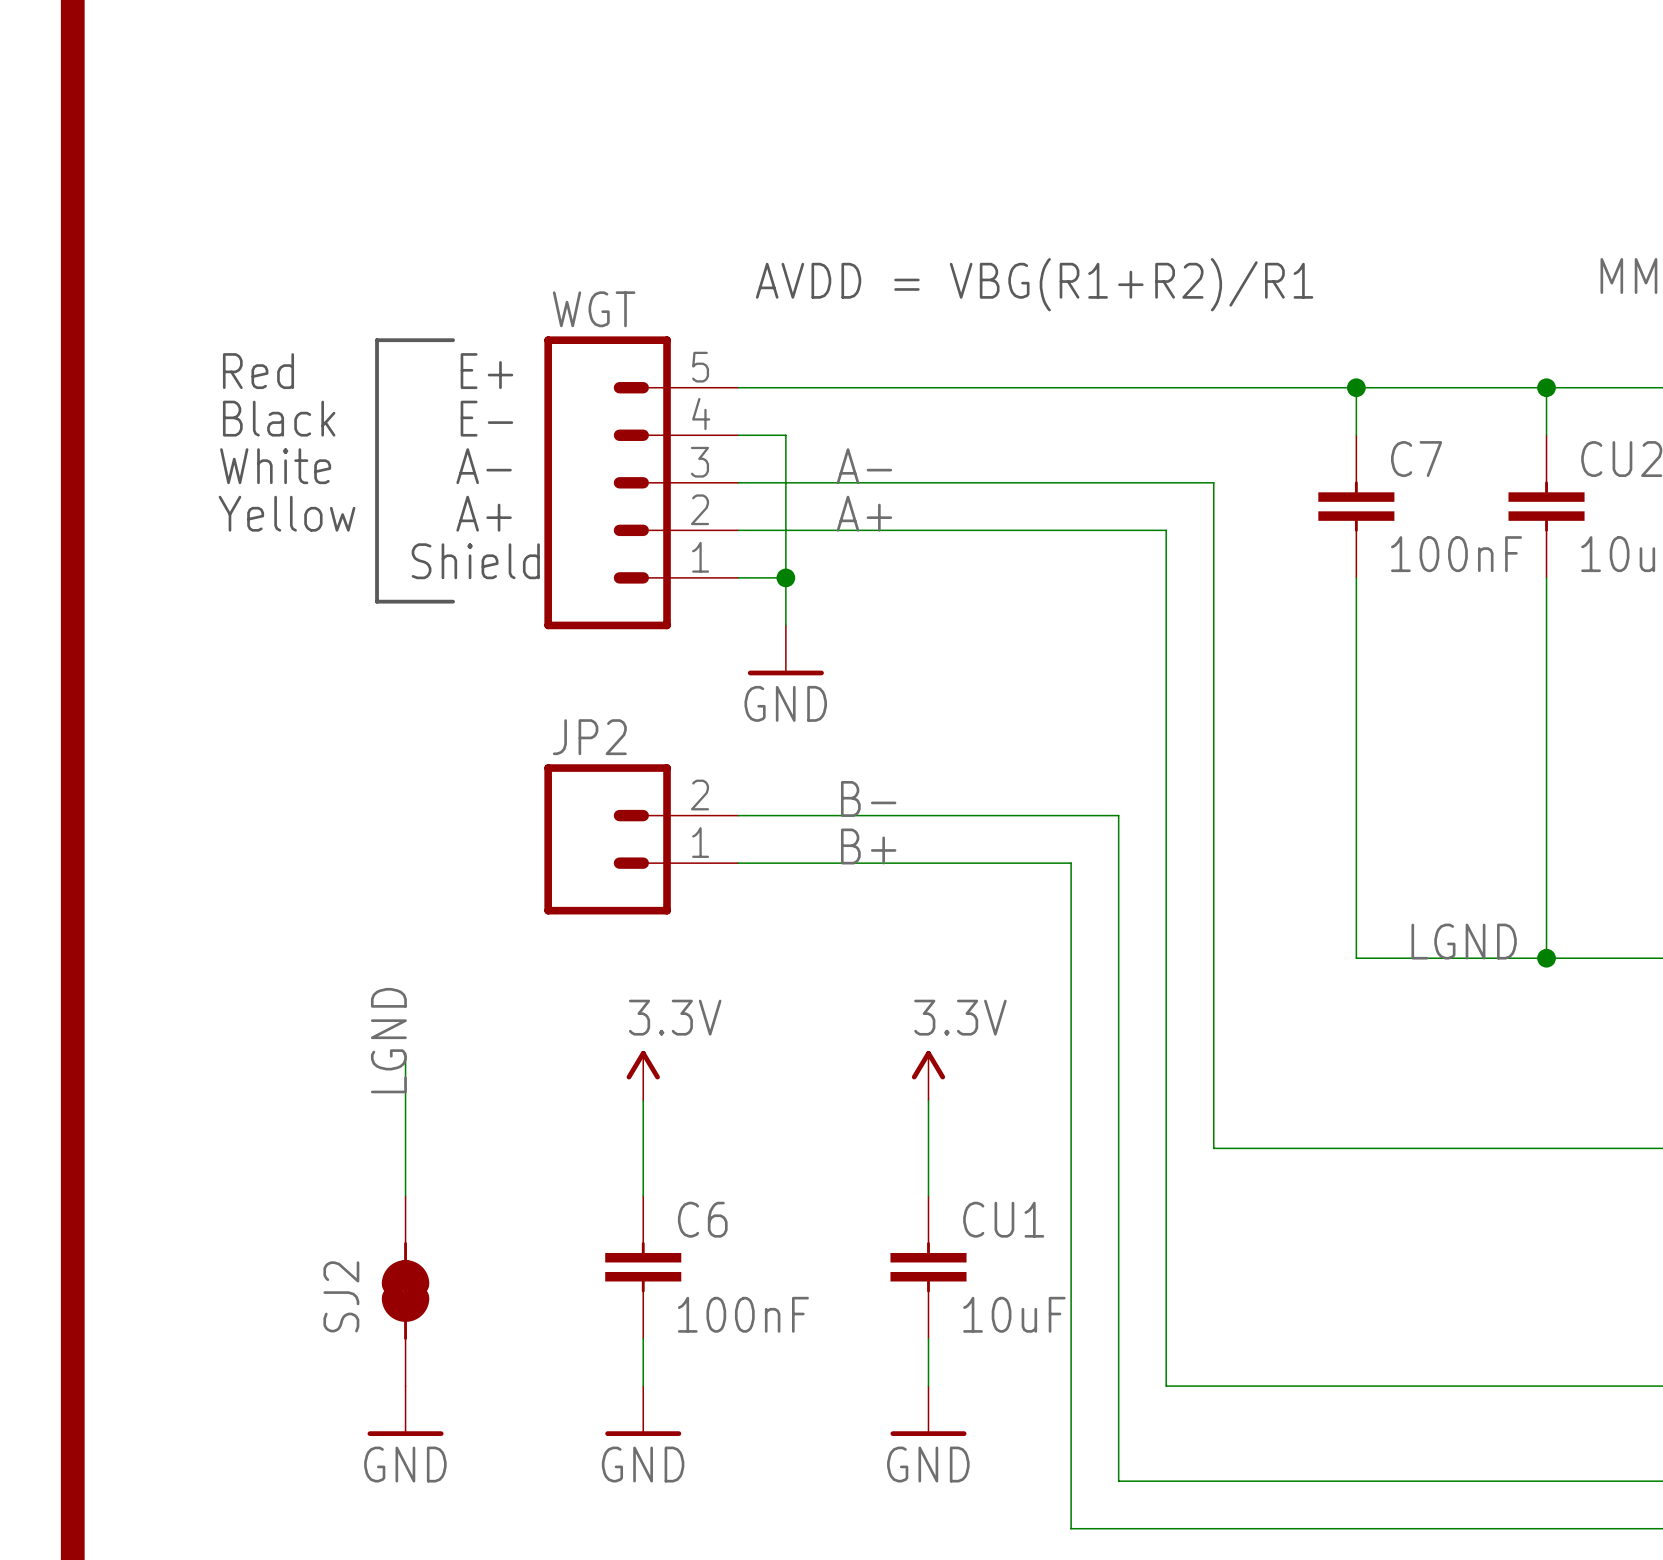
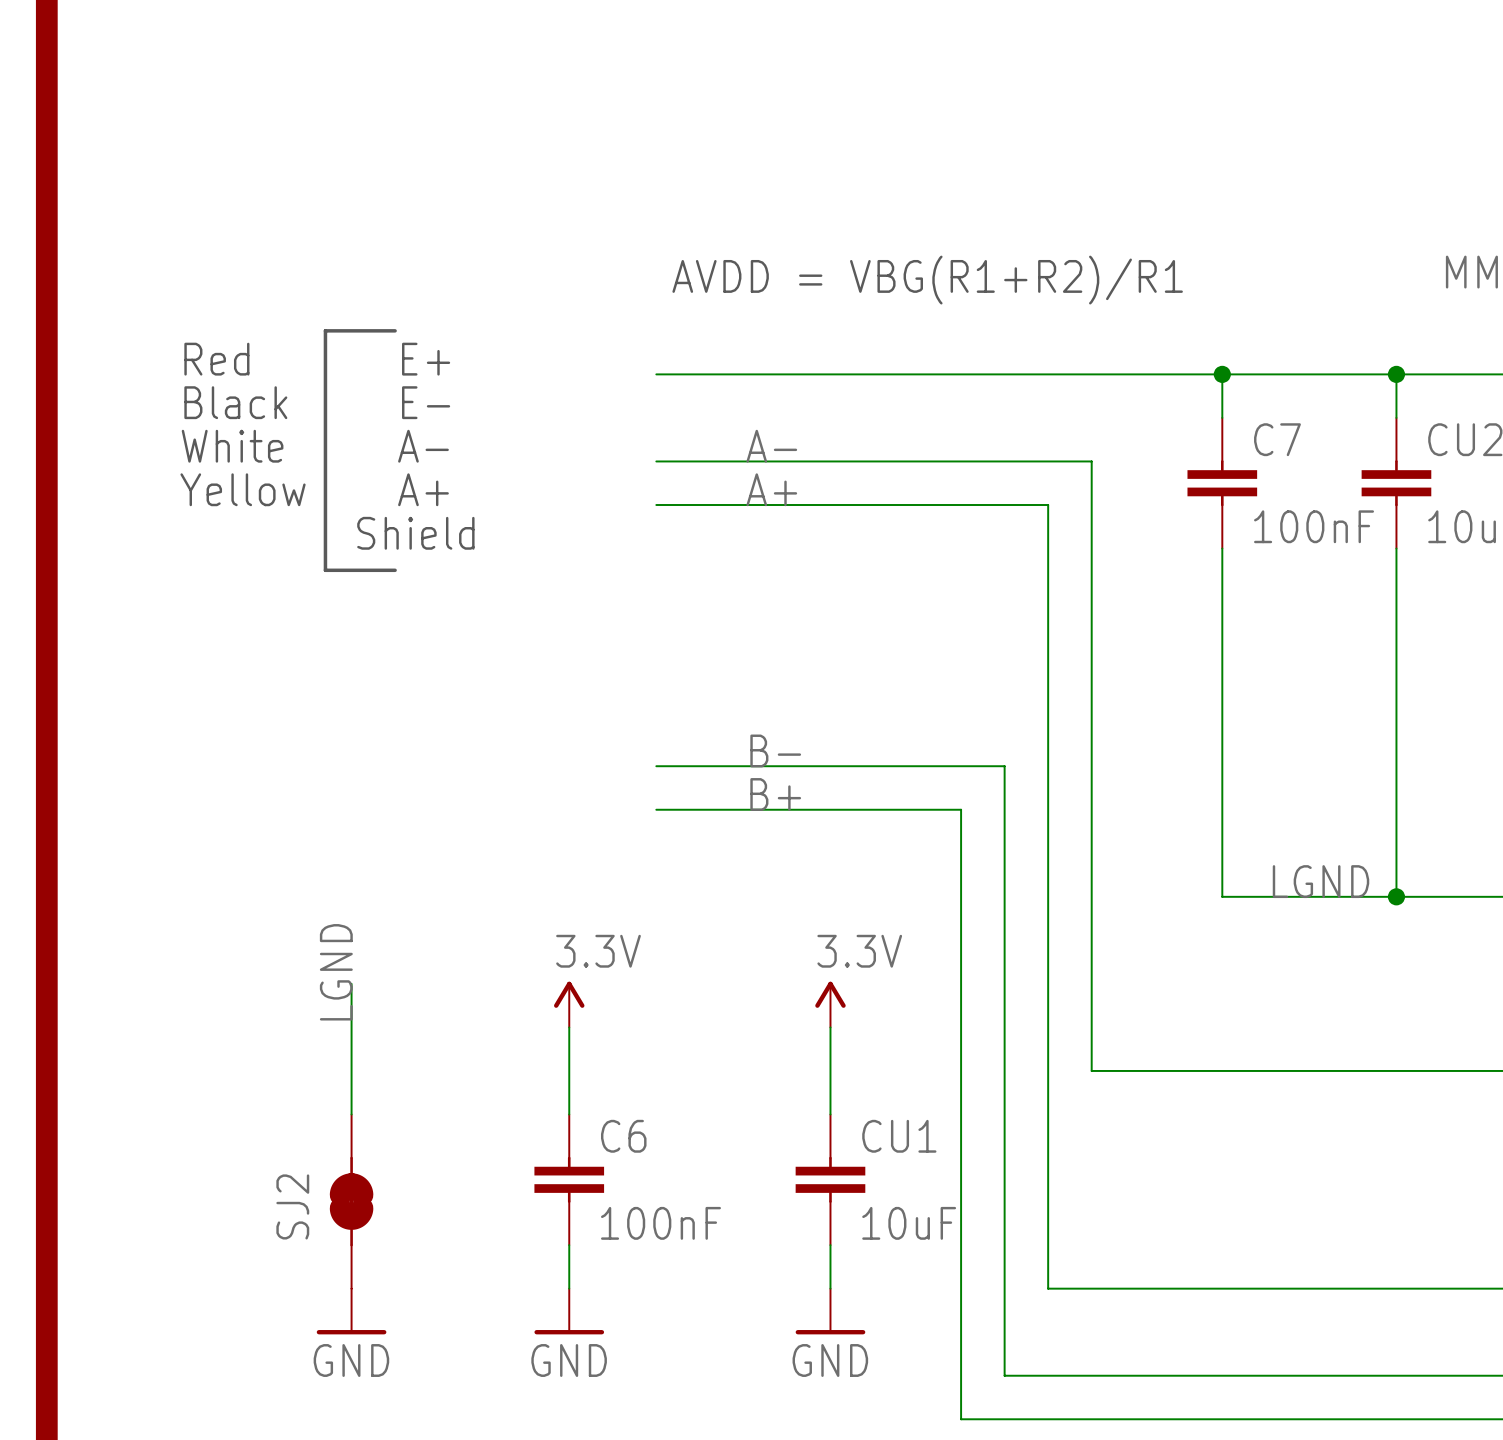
wire: (738, 435) (785, 435) (785, 625) -> none
WGT: (641, 482) -> none
wire: (738, 577) (785, 577) -> none
junction: (785, 577) -> none
power symbol: GND (785, 650) -> none
JP2: (641, 839) -> none

